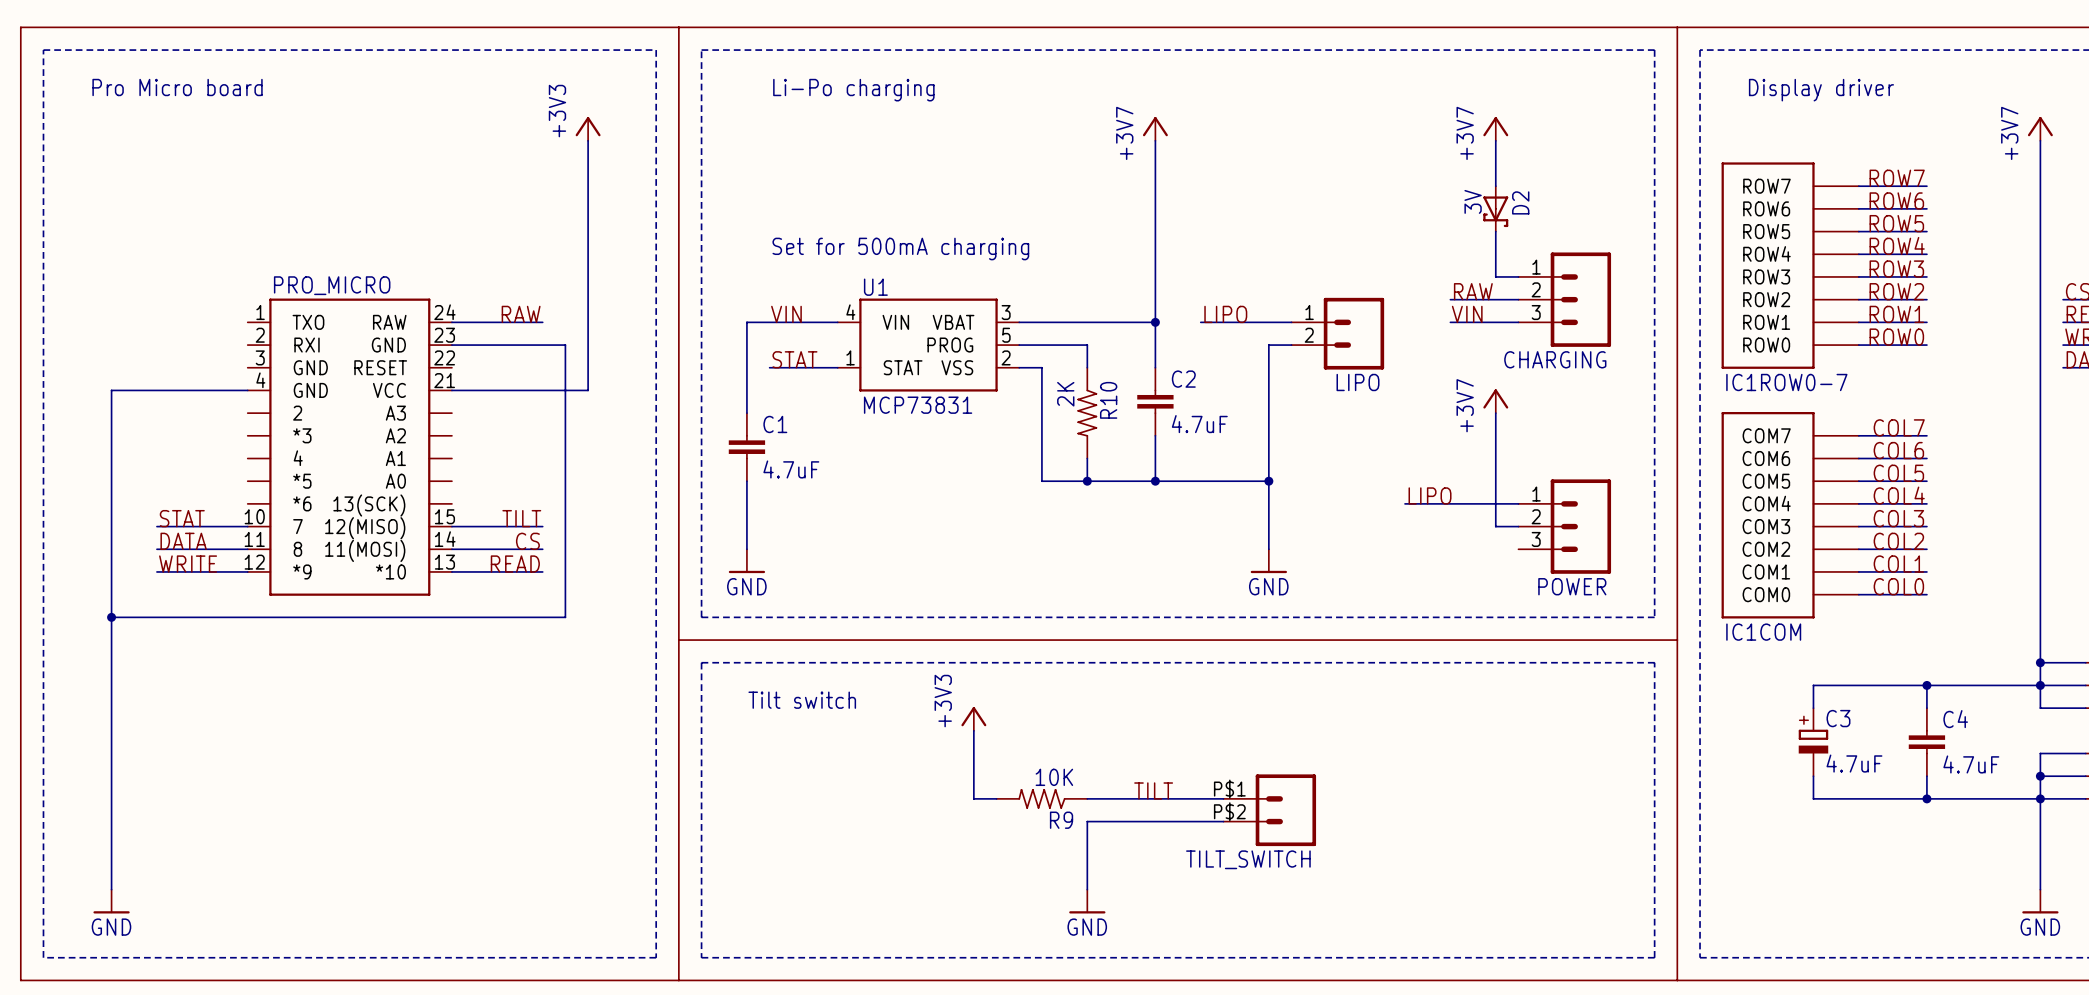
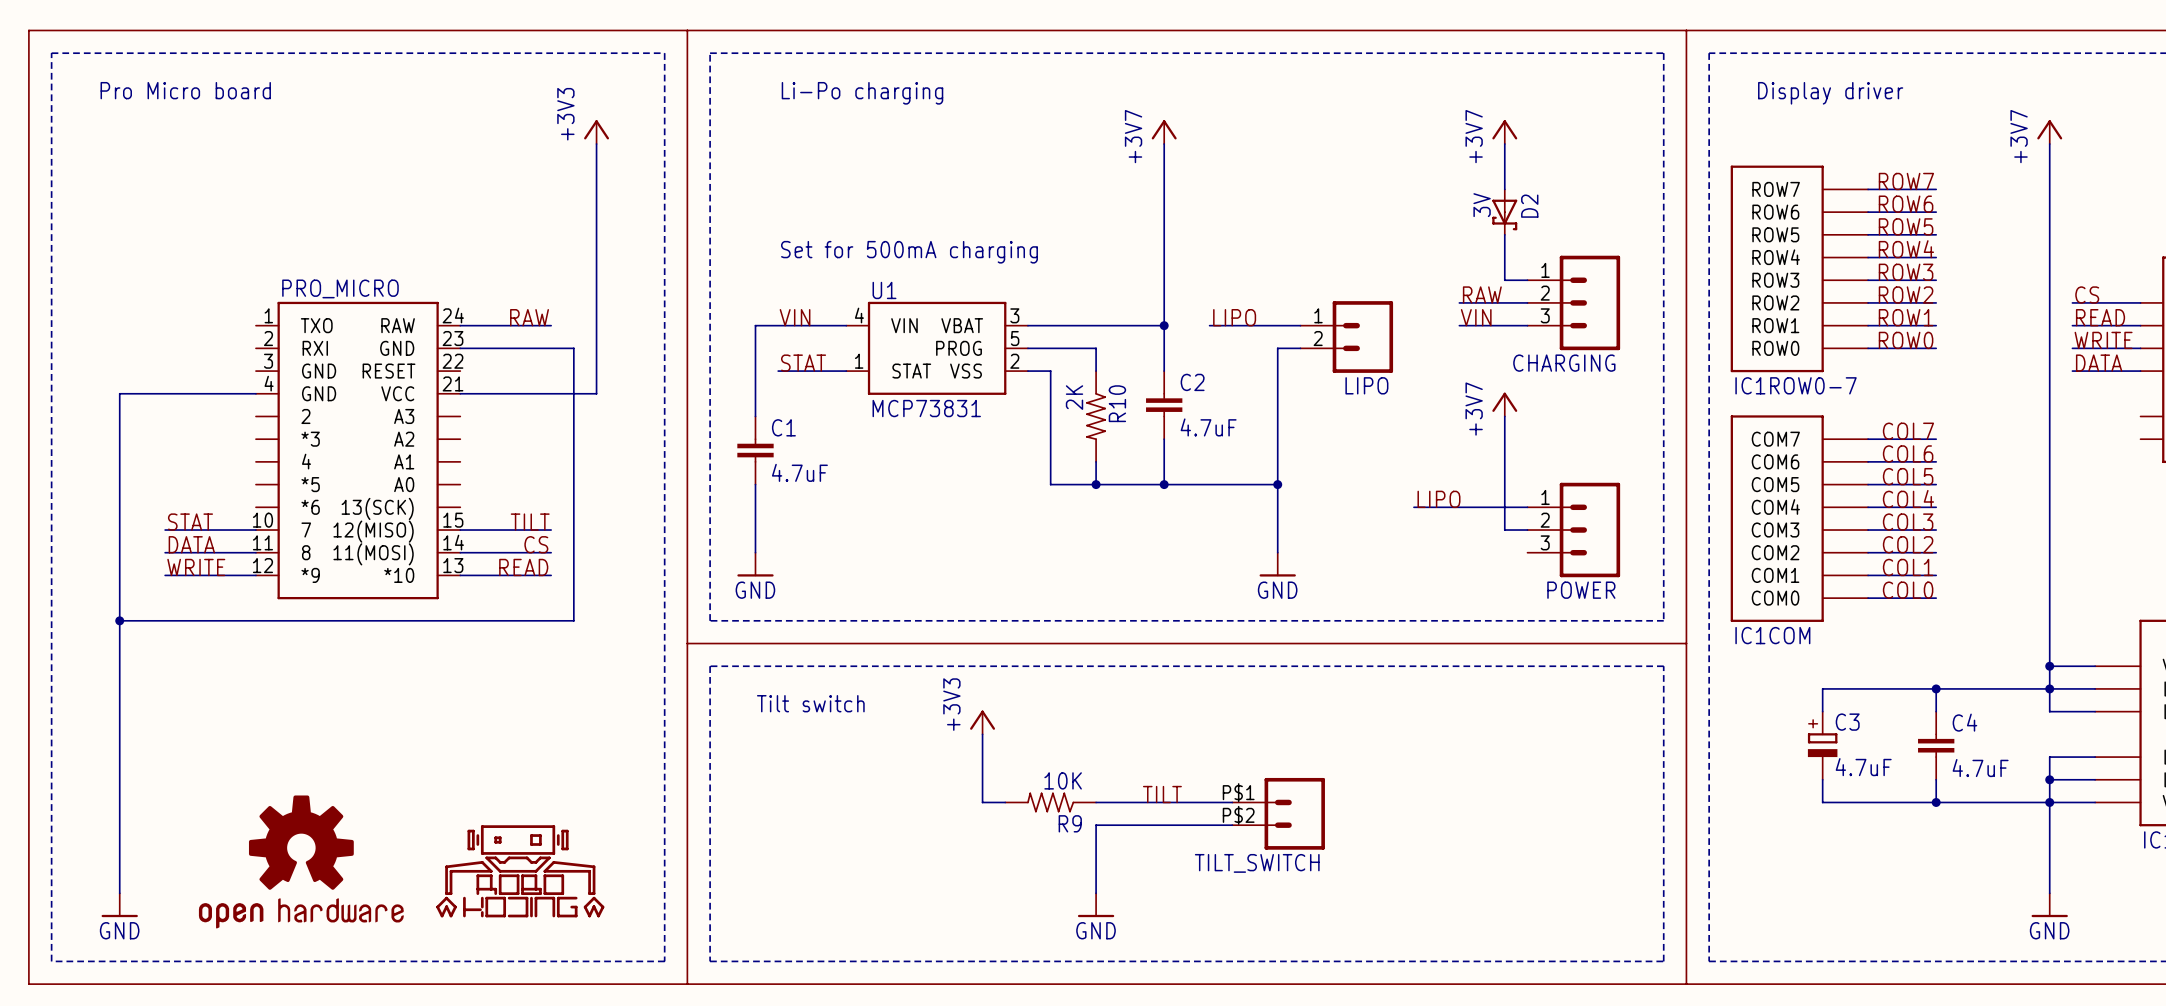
part: none -> (301, 861)
part: none -> (520, 871)

